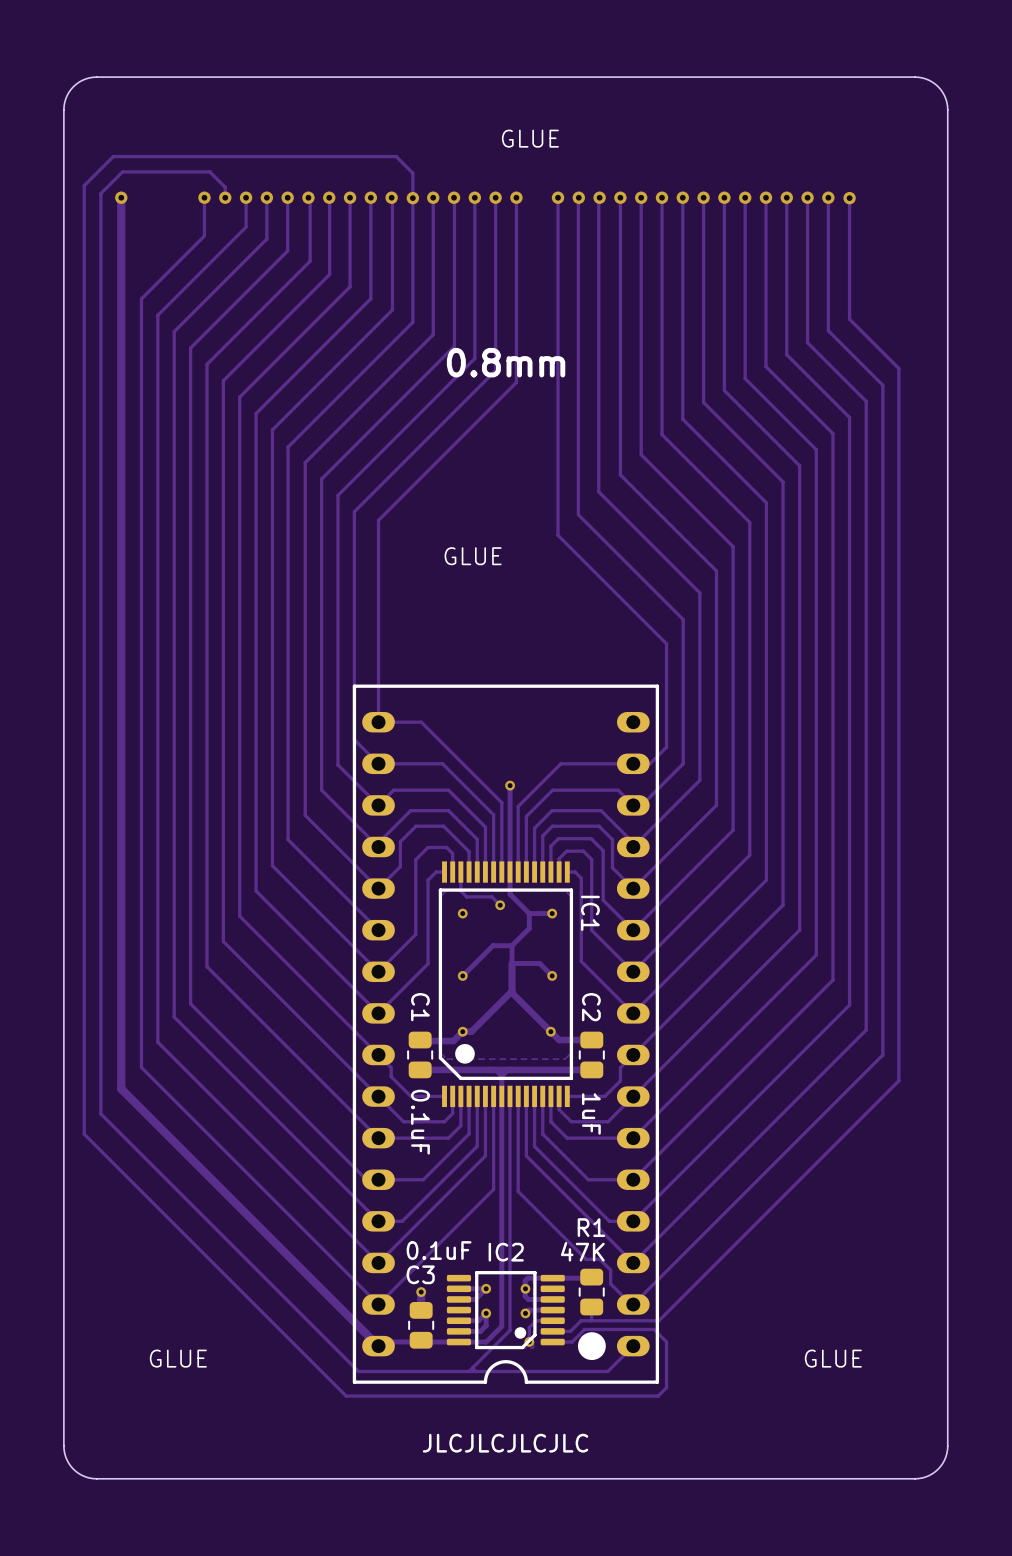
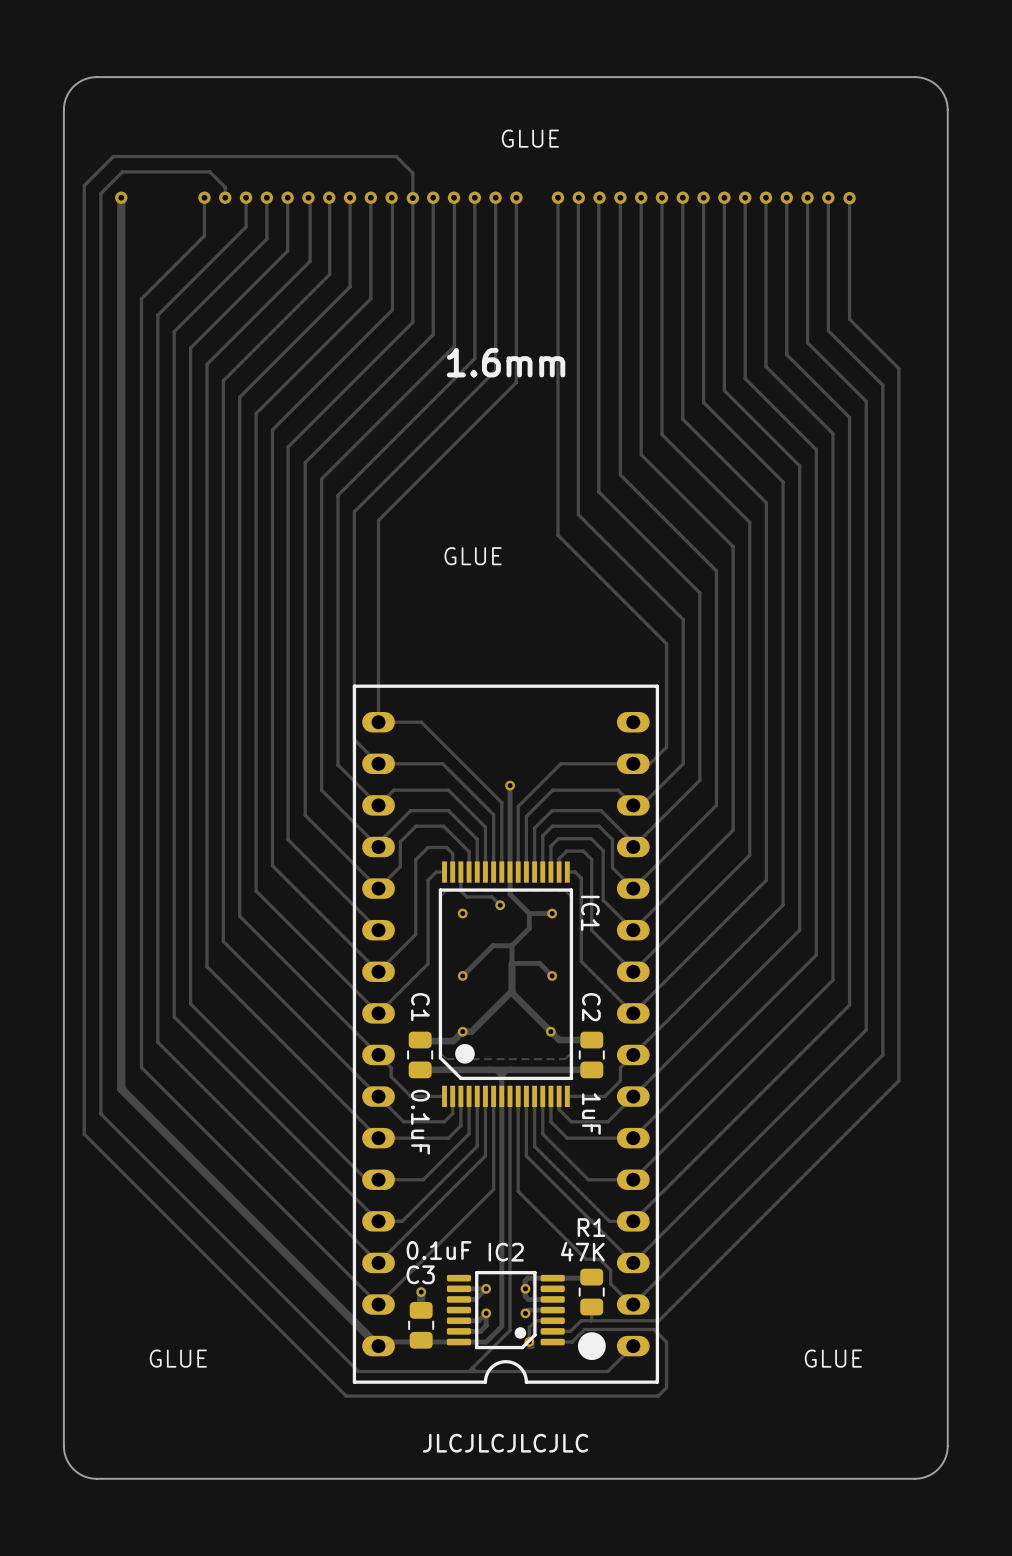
text: 0.8mm (506, 362) -> 1.6mm (506, 362)

